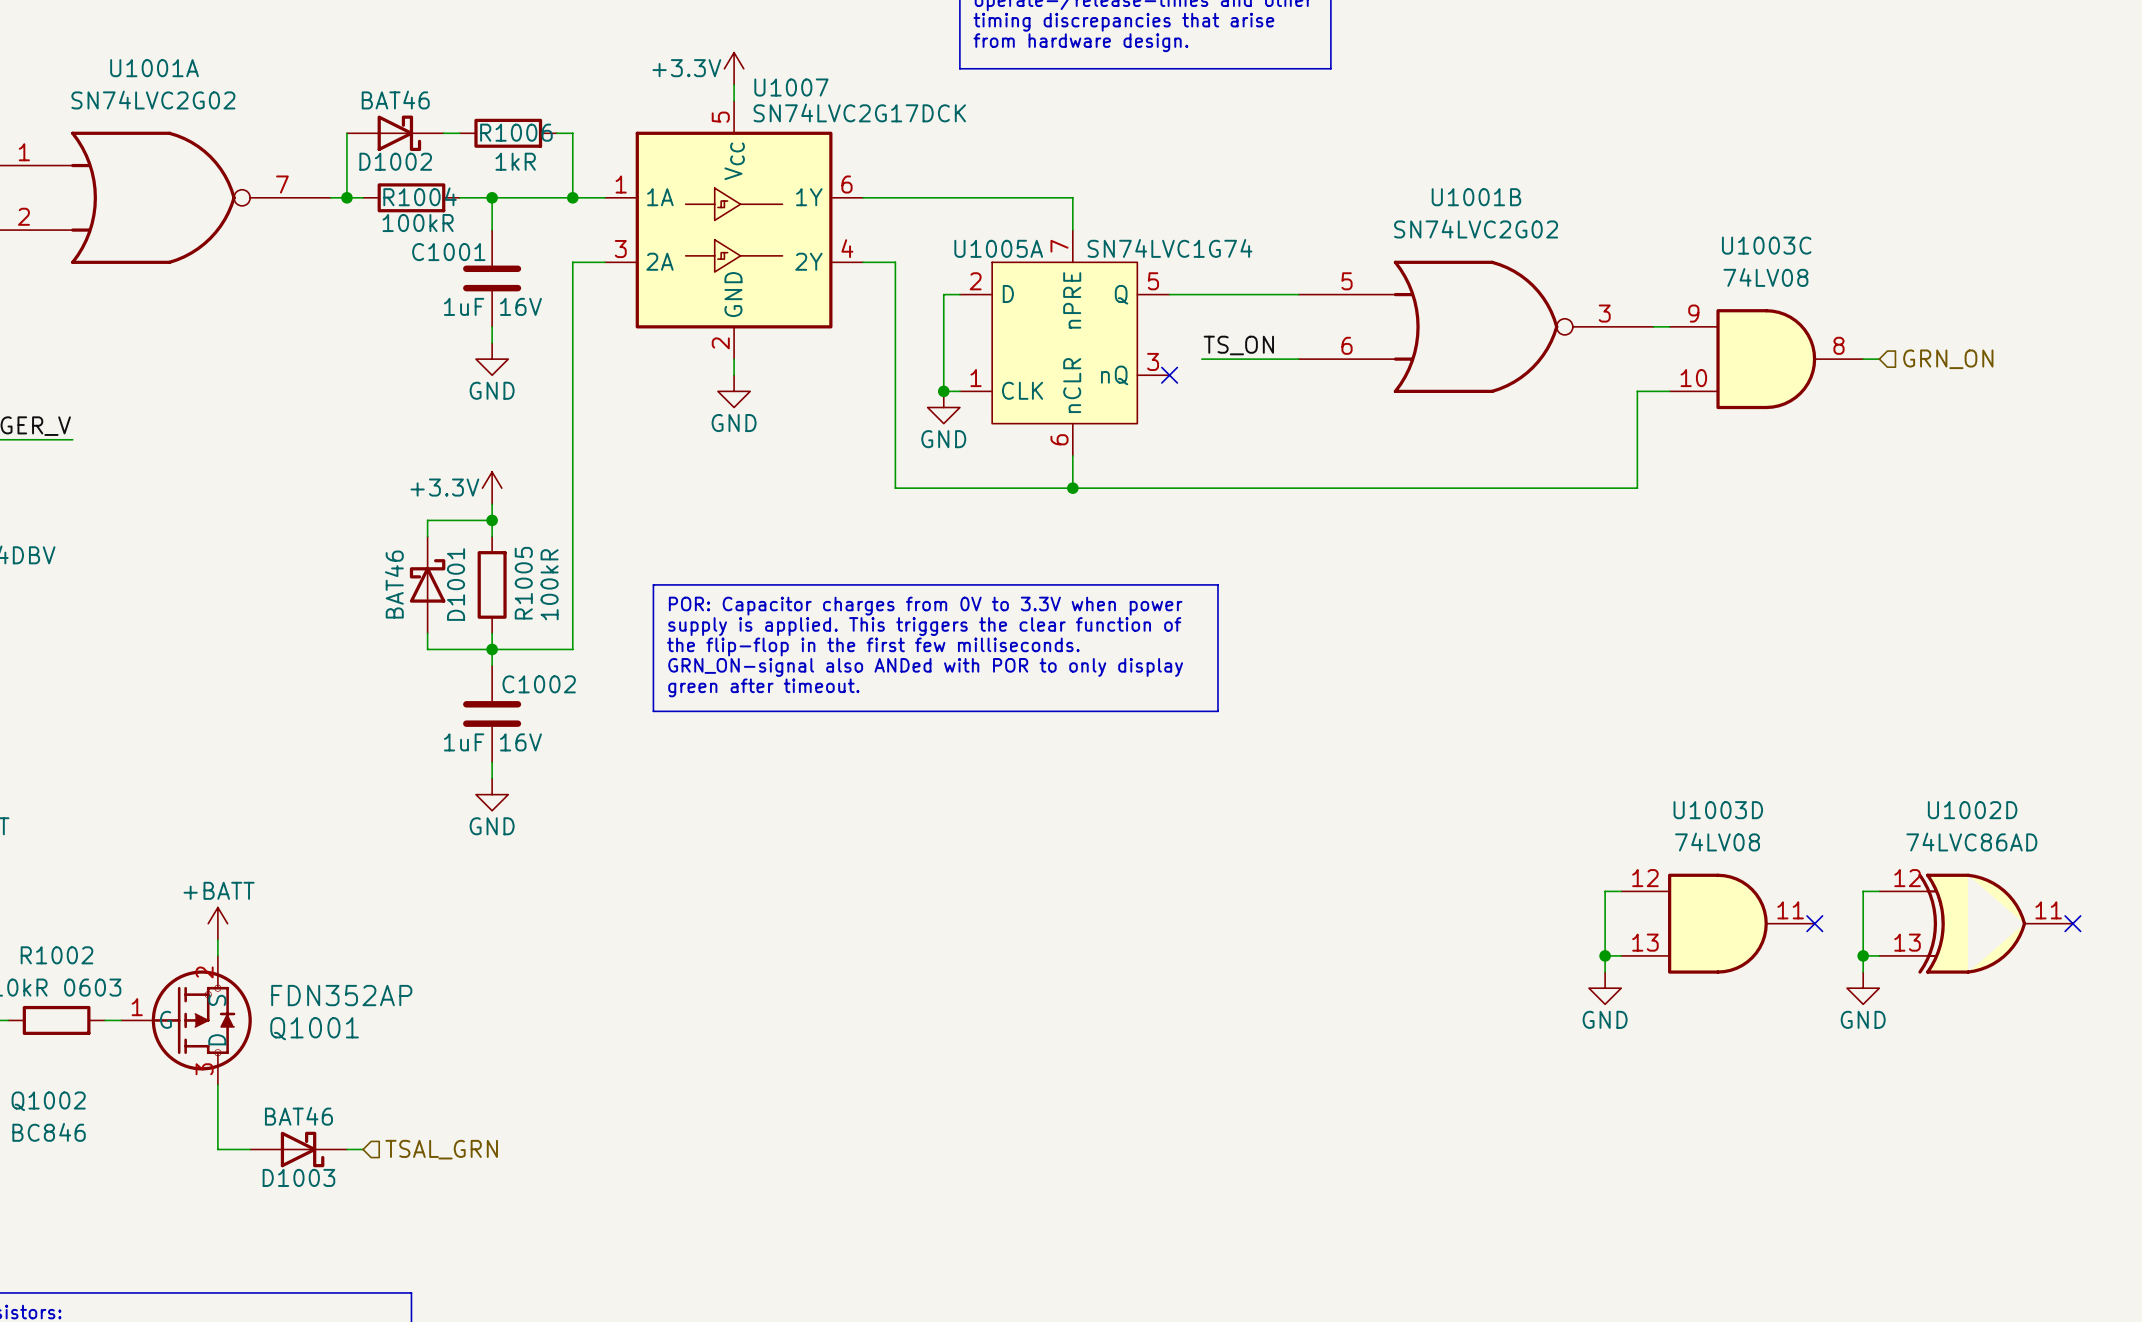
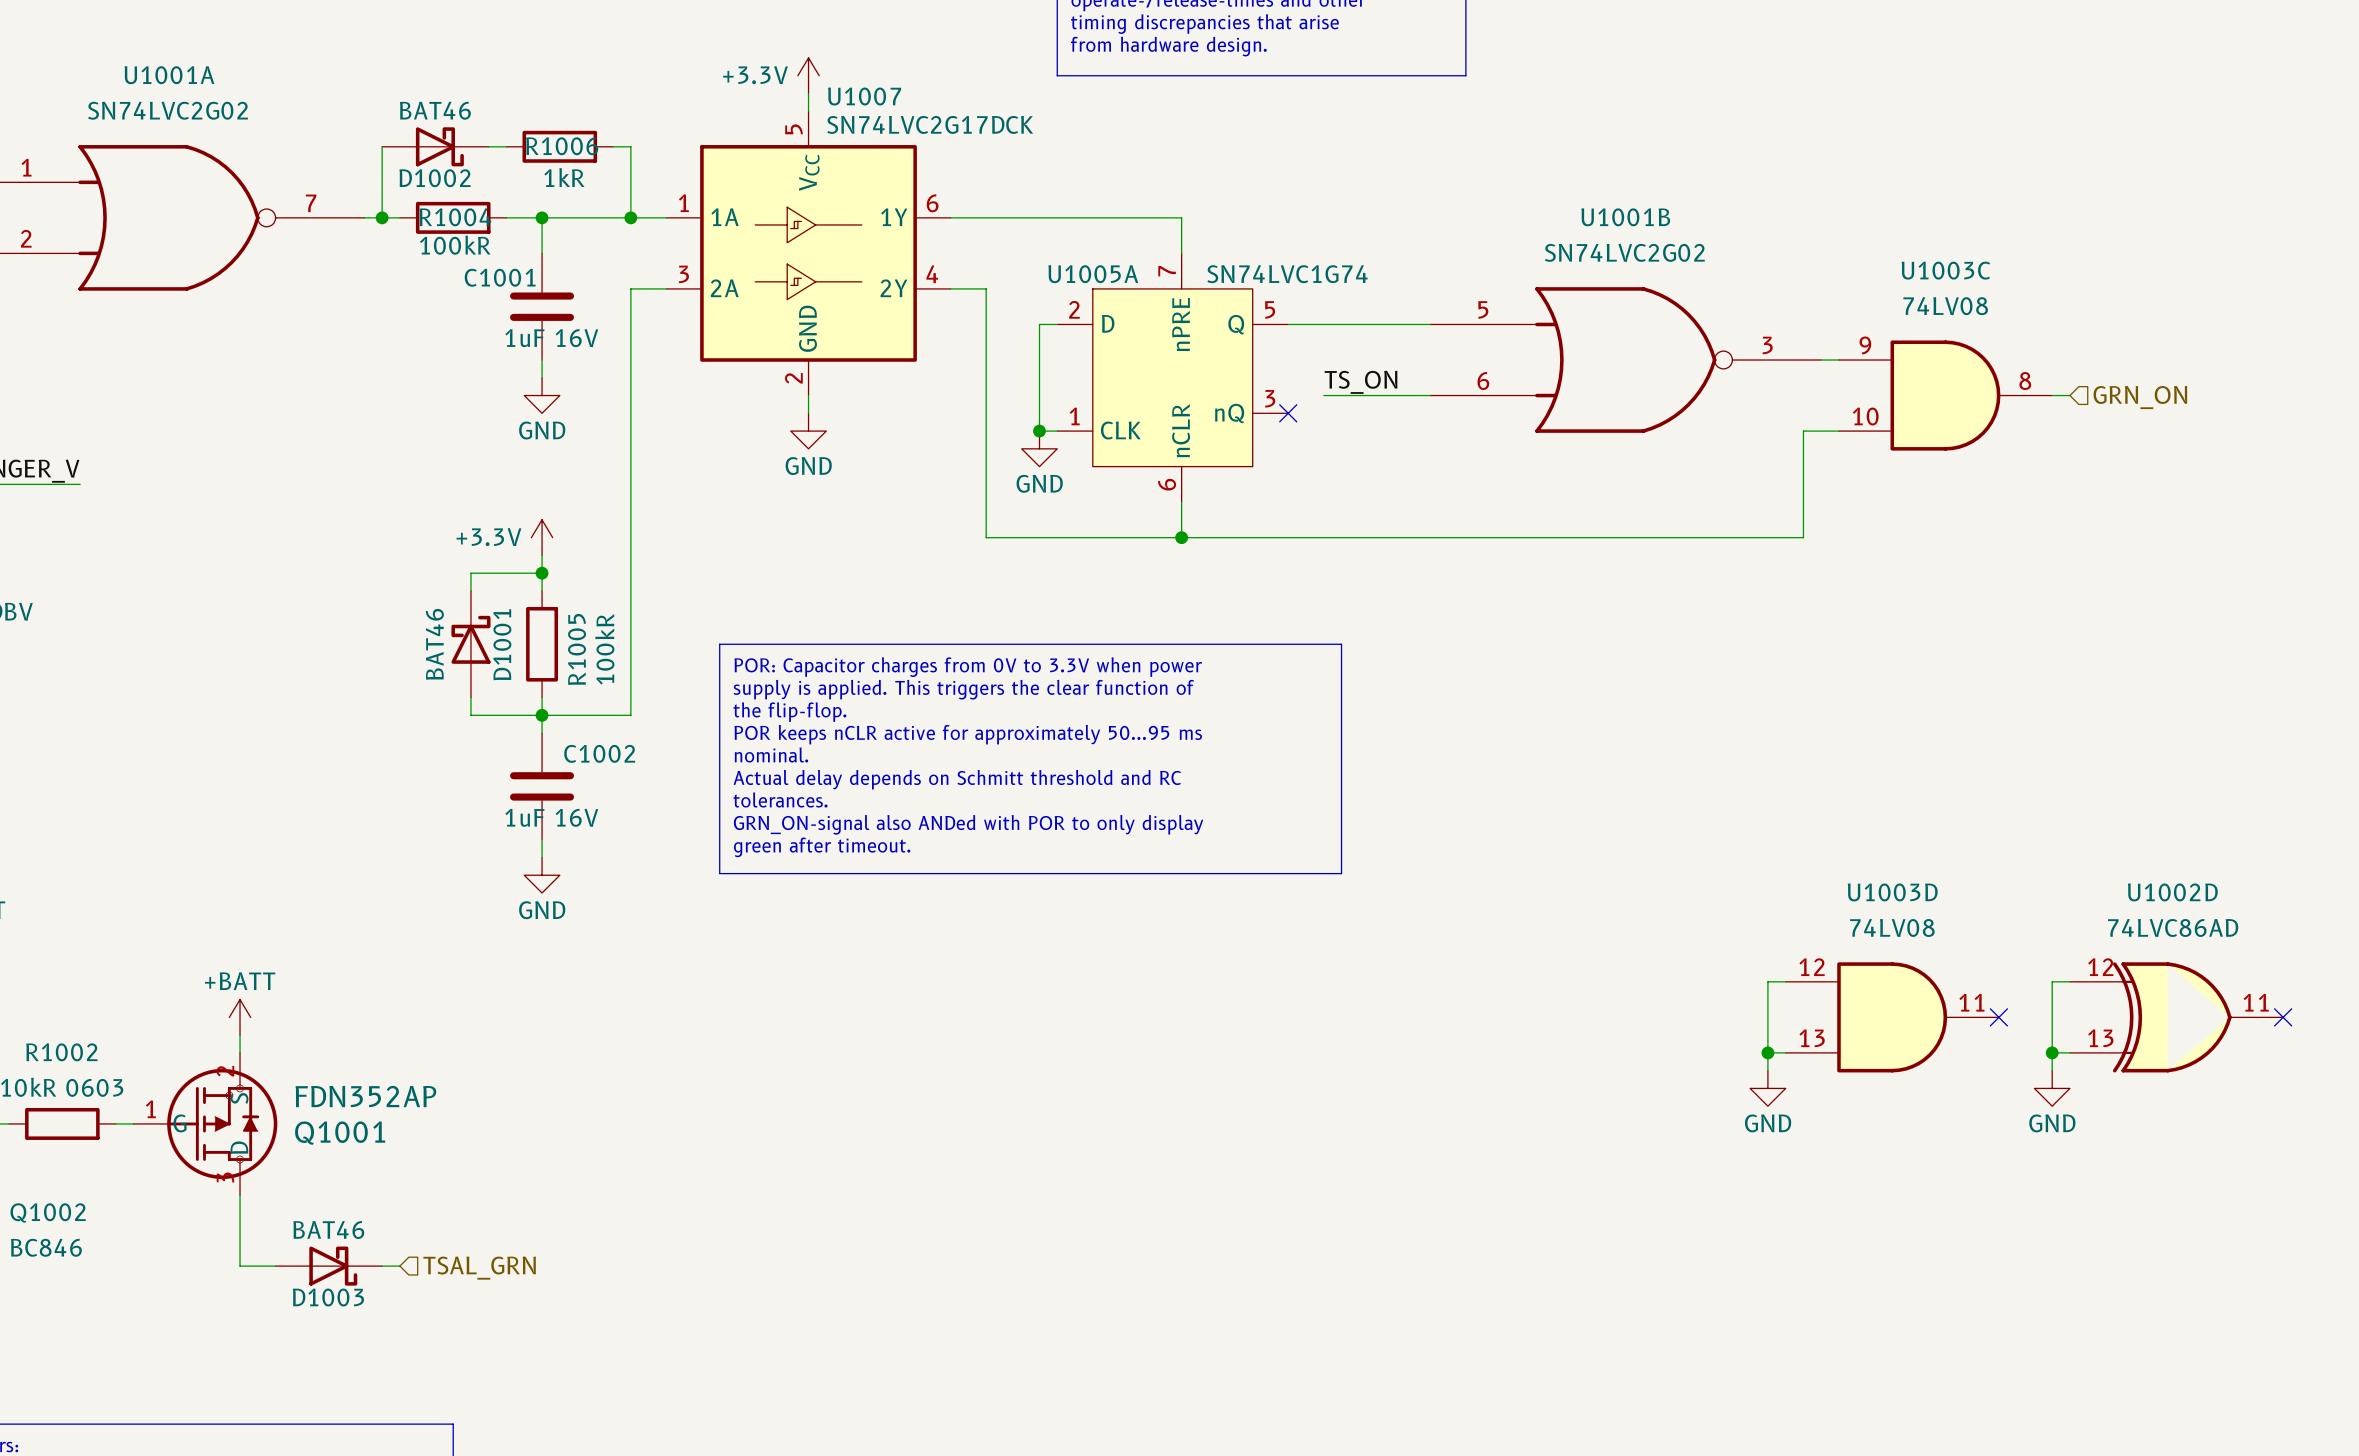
text: the flip-flop in the first few milliseconds. (873, 647) -> the flip-flop. (789, 712)
text: GRN_ON-signal also ANDed with POR to only display (925, 667) -> POR keeps nCLR active for approximately 50...95 ms (968, 734)
text: green after timeout. (763, 687) -> nominal. (771, 754)
text: none -> Actual delay depends on Schmitt threshold and RC (957, 779)
line: (653, 711) (1217, 711) -> (719, 783) (719, 873) (1341, 873) (1341, 783)
text: none -> tolerances. (780, 800)
text: none -> GRN_ON-signal also ANDed with POR to only display (968, 824)
text: none -> green after timeout. (822, 847)

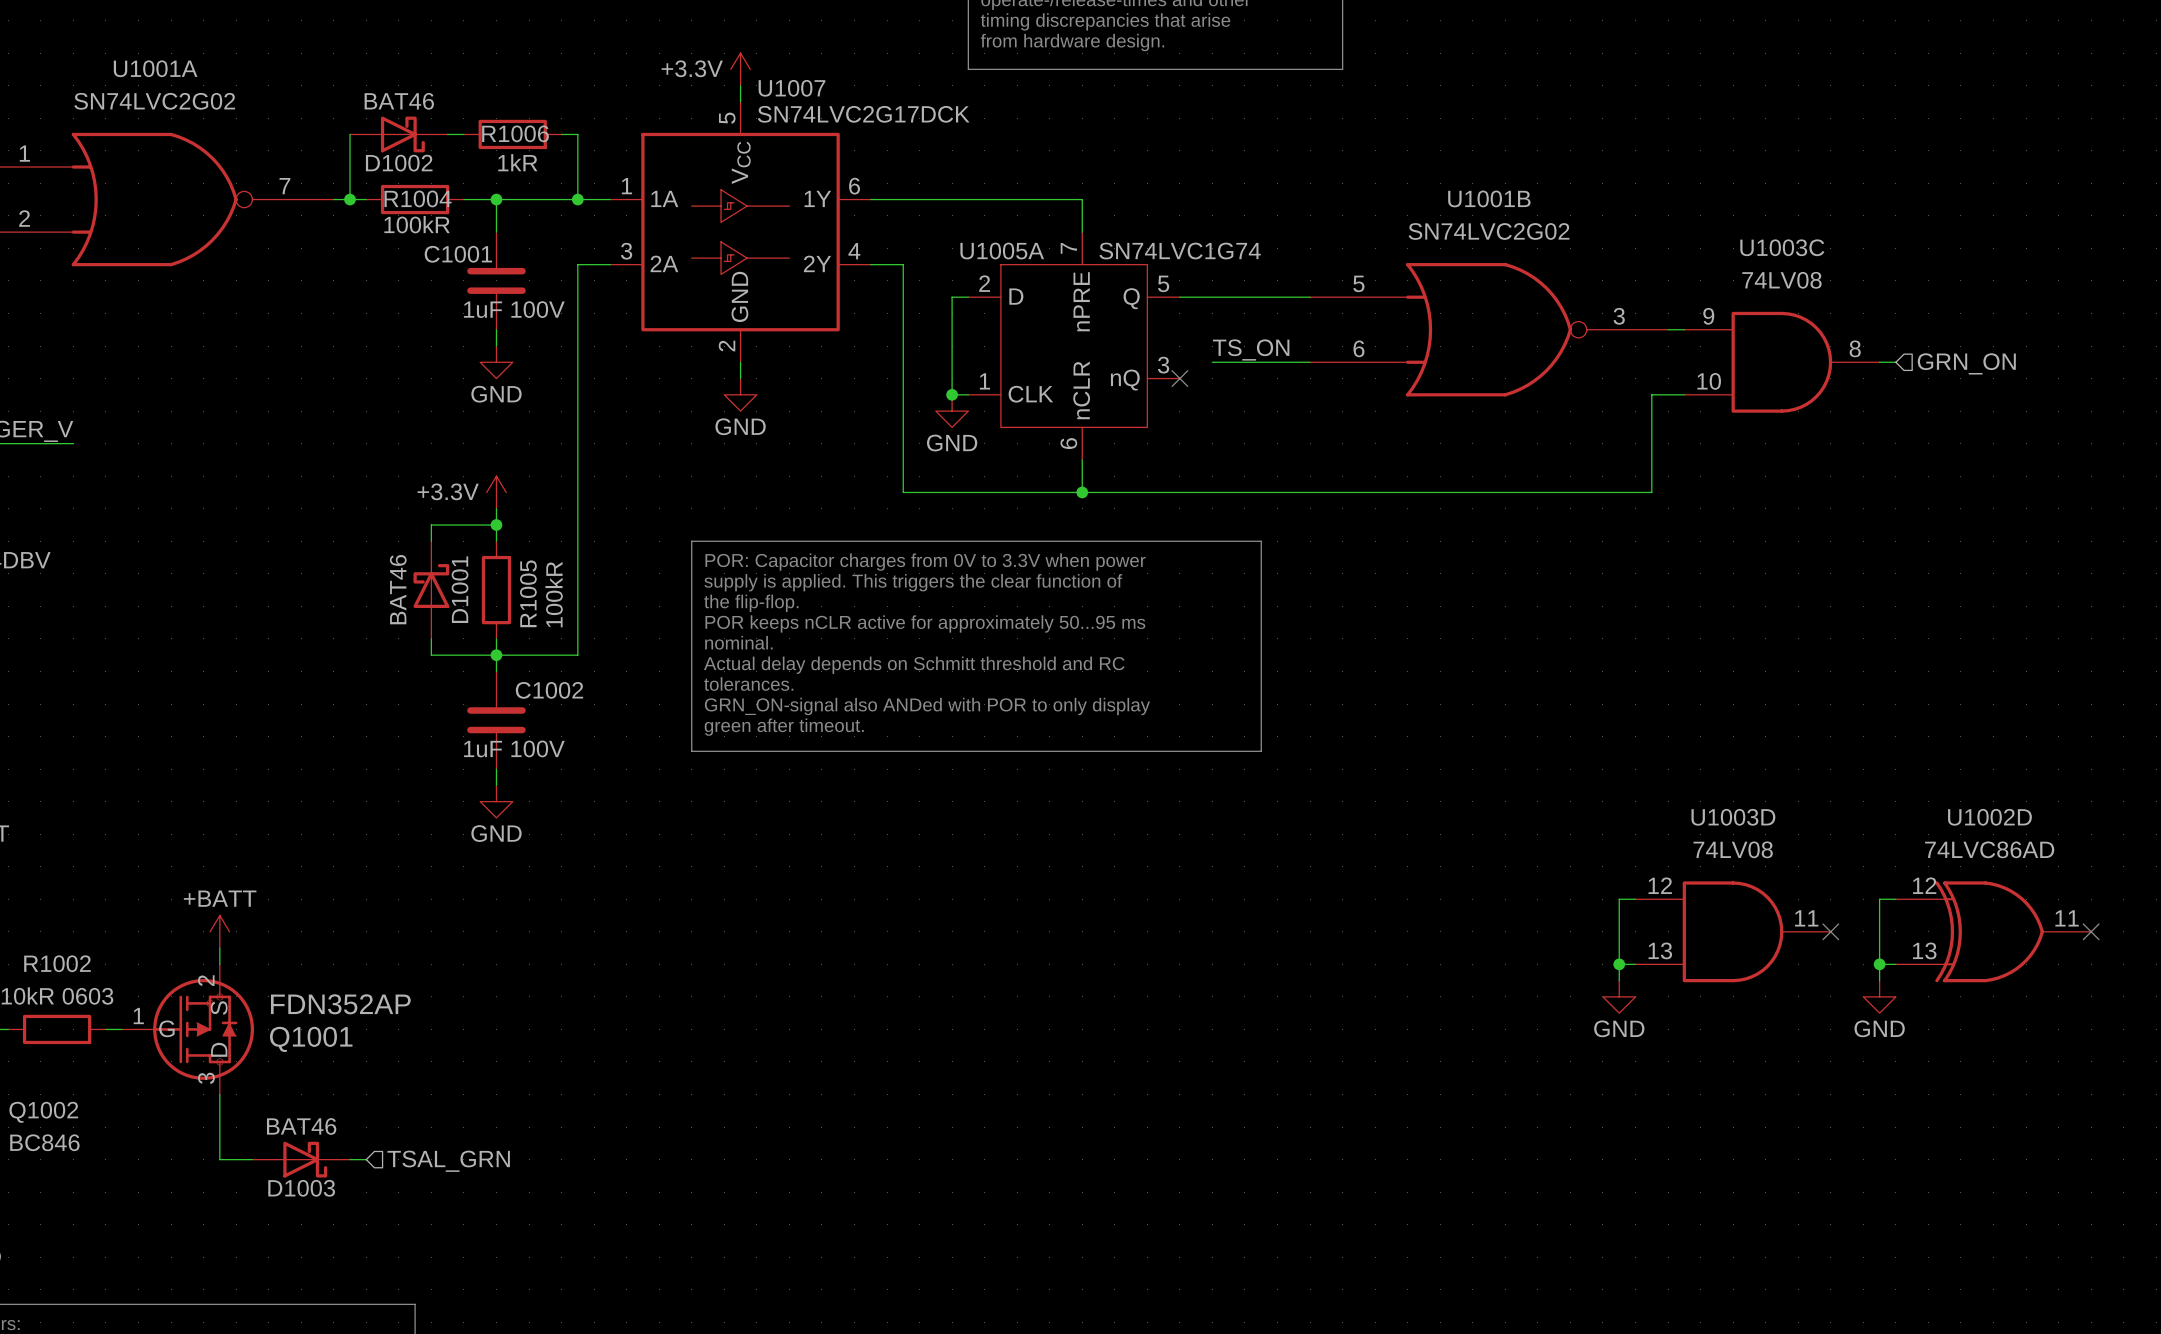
C1001 value: 1uF 16V (551, 338) -> 1uF 100V (514, 309)
line: (719, 644) (1341, 644) (1341, 873) (719, 873) (719, 644) -> (691, 541) (691, 751) (1261, 751) (1261, 541) (691, 541)
text position: POR: Capacitor charges from 0V to 3.3V when power (968, 667) -> POR: Capacitor charges from 0V to 3.3V when power (925, 562)
text position: supply is applied. This triggers the clear function of (963, 689) -> supply is applied. This triggers the clear function of (913, 582)
text position: the flip-flop. (789, 712) -> the flip-flop. (751, 603)
text position: POR keeps nCLR active for approximately 50...95 ms (968, 734) -> POR keeps nCLR active for approximately 50...95 ms (925, 623)
text position: nominal. (771, 754) -> nominal. (738, 642)
text position: Actual delay depends on Schmitt threshold and RC (957, 779) -> Actual delay depends on Schmitt threshold and RC (914, 665)
text position: tolerances. (780, 800) -> tolerances. (748, 684)
C1002 value: 1uF 16V (551, 817) -> 1uF 100V (514, 748)
text position: GRN_ON-signal also ANDed with POR to only display (968, 824) -> GRN_ON-signal also ANDed with POR to only display (927, 706)
text position: green after timeout. (822, 847) -> green after timeout. (784, 727)

